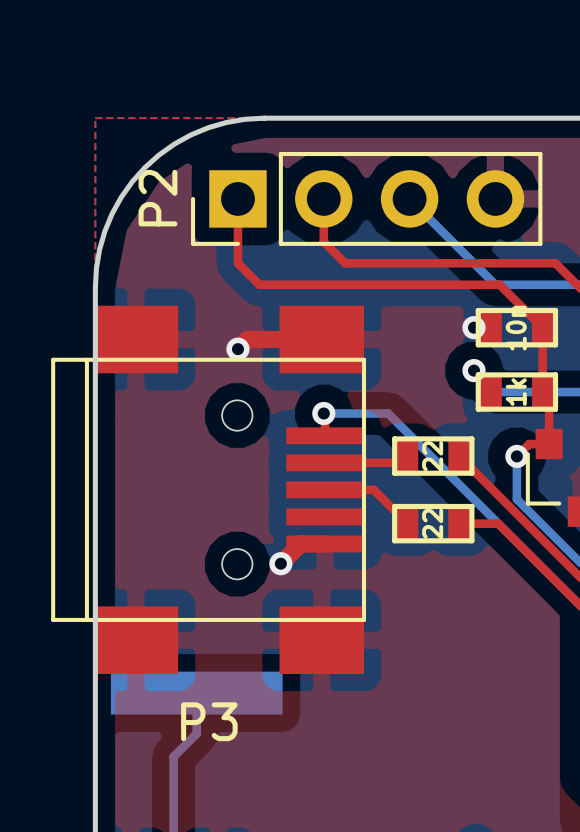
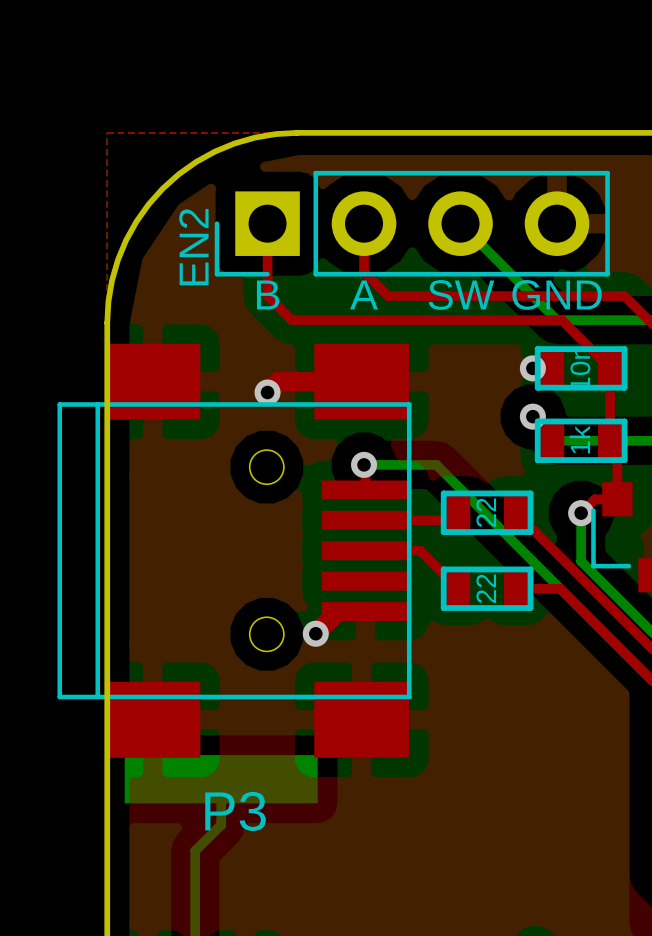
P2 name: P2 (157, 198) -> none
text: none -> EN2 (193, 247)
text: none -> B (268, 294)
text: none -> A (364, 294)
text: none -> SW (461, 294)
text: none -> GND (557, 294)

